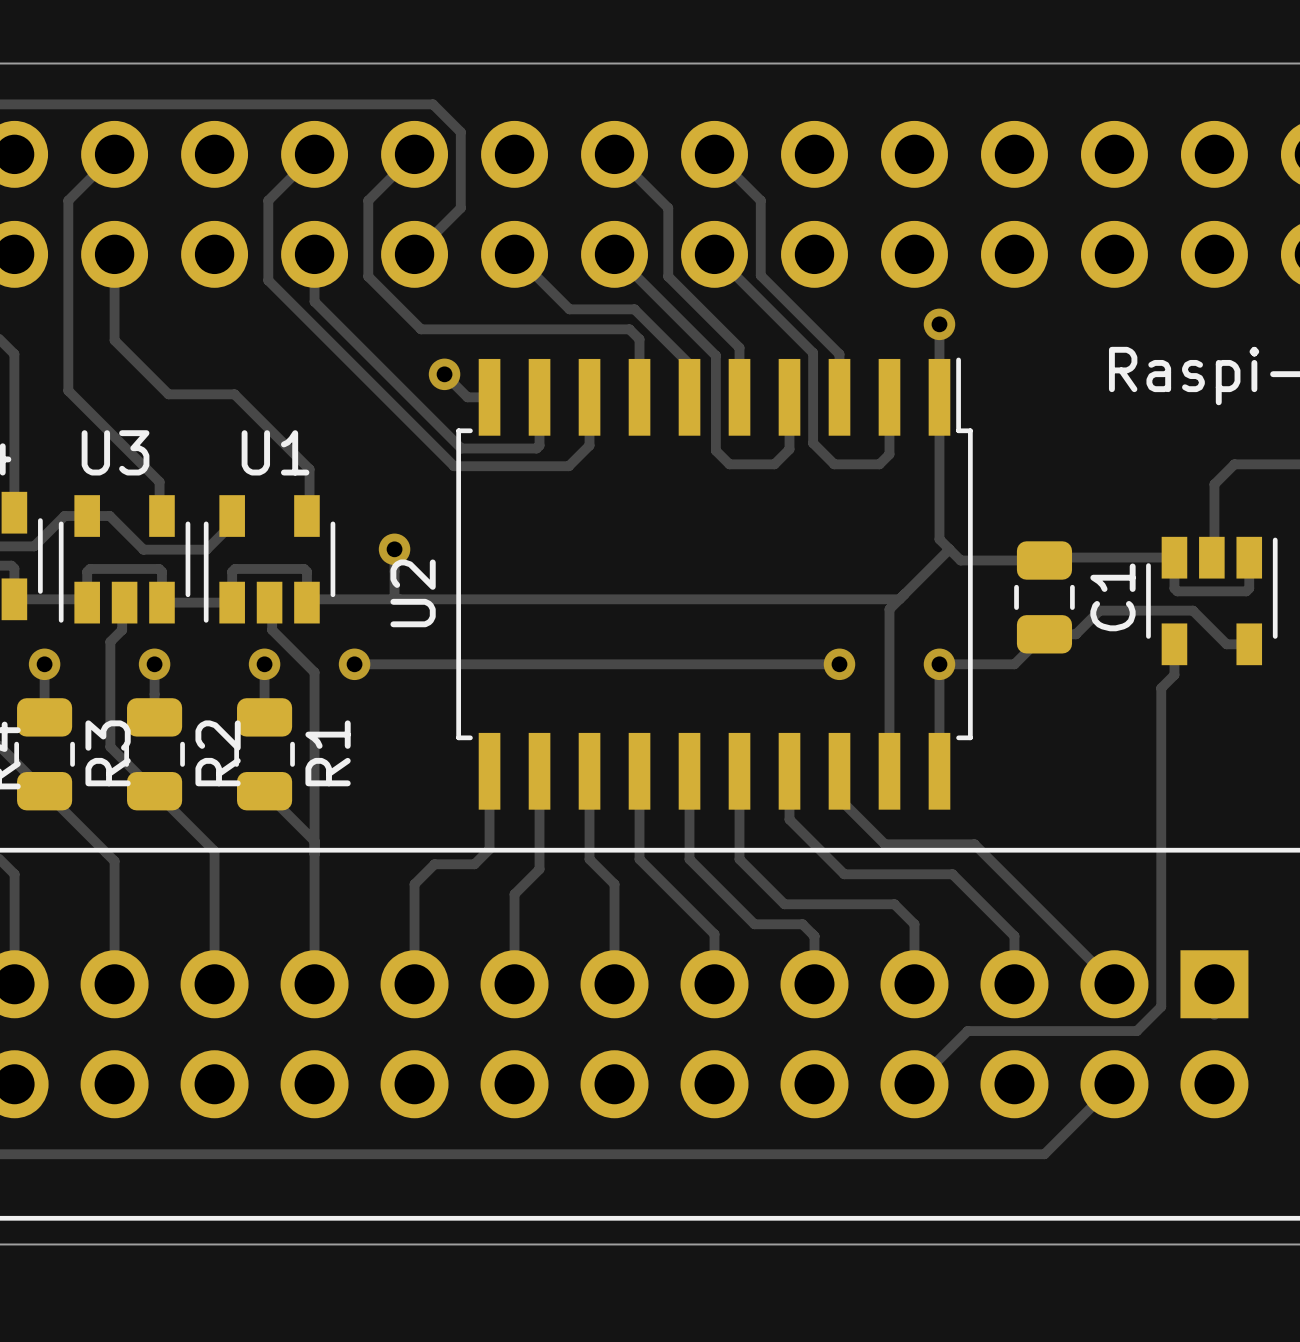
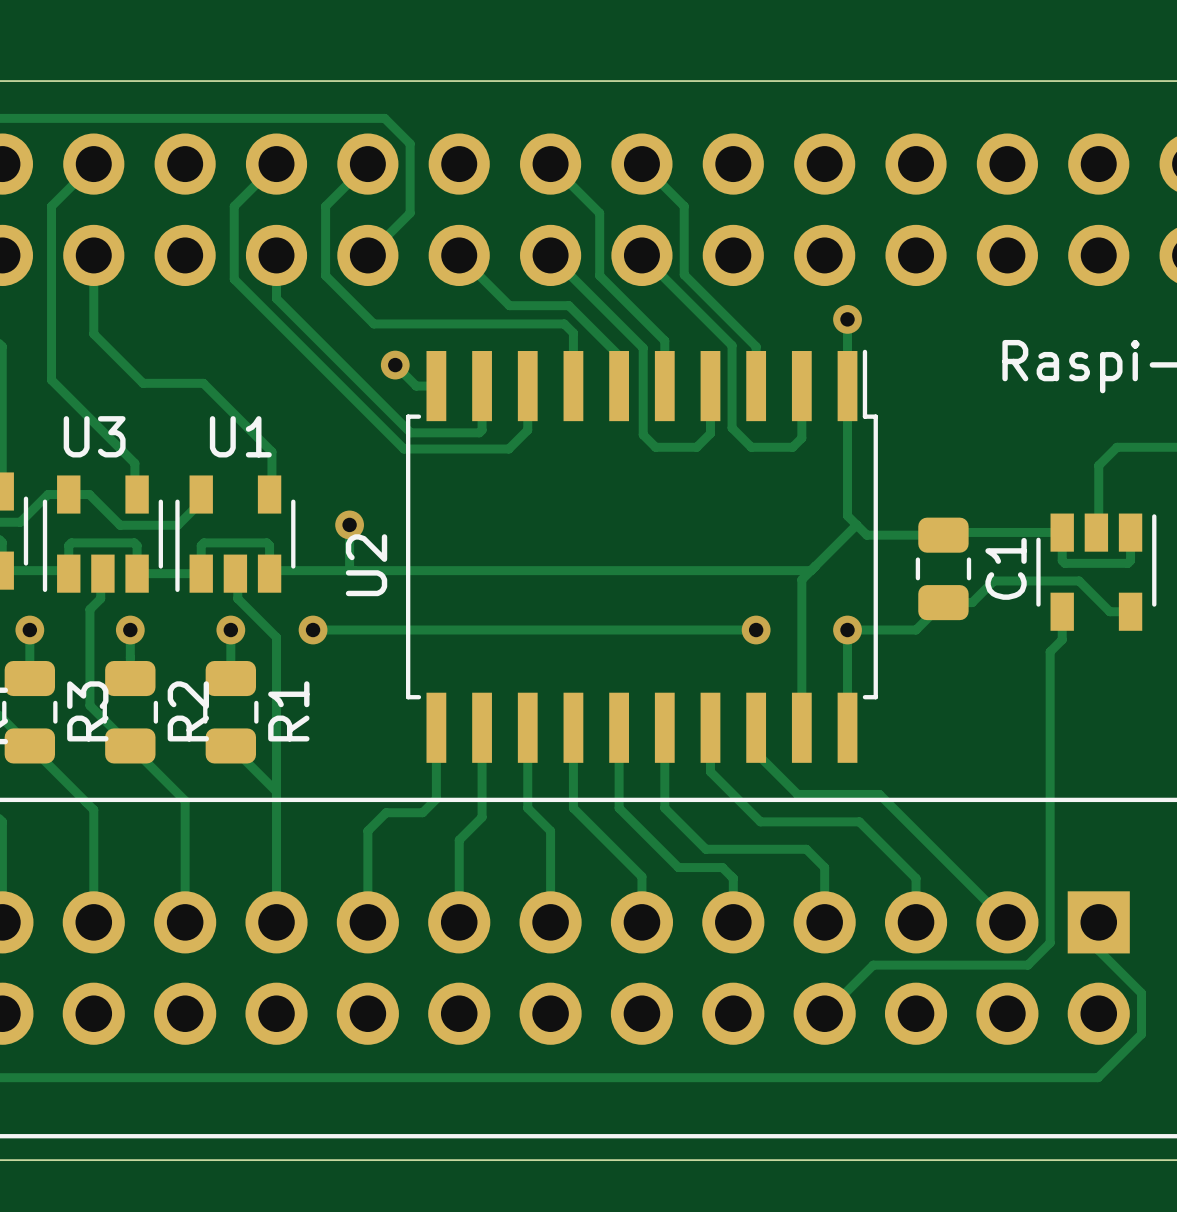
track: (1114, 1084) (1044, 1154) -> (1098, 950) (1141, 993) (1141, 1034) (1098, 1077) (943, 1077)

